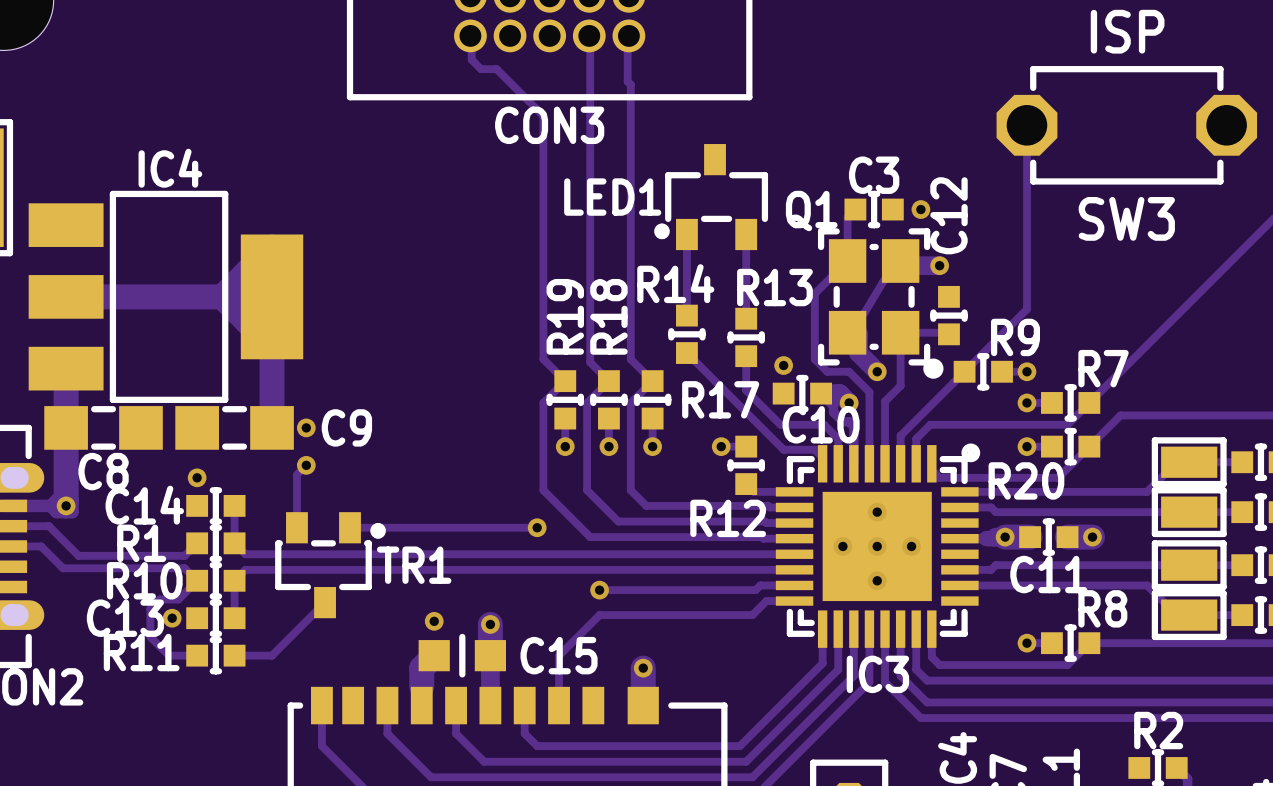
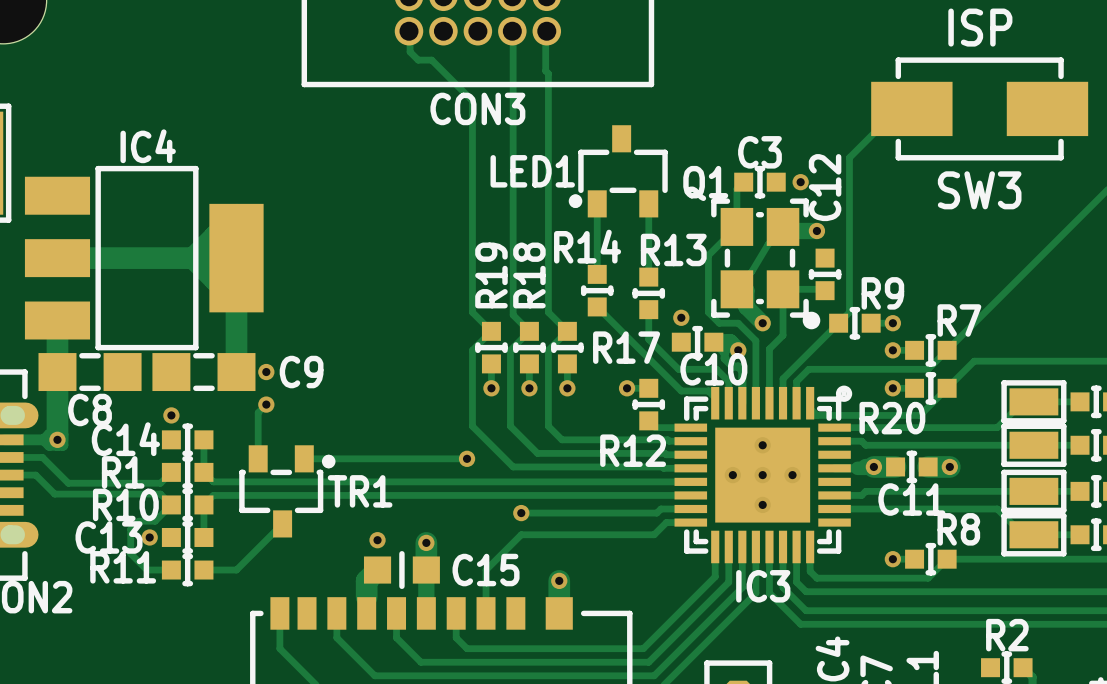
SW3 footprint: [996, 66, 1258, 185] -> [871, 57, 1089, 161]
track: (1026, 125) (1026, 309) (977, 359) -> (911, 108) (898, 108) (849, 157) (849, 312)

